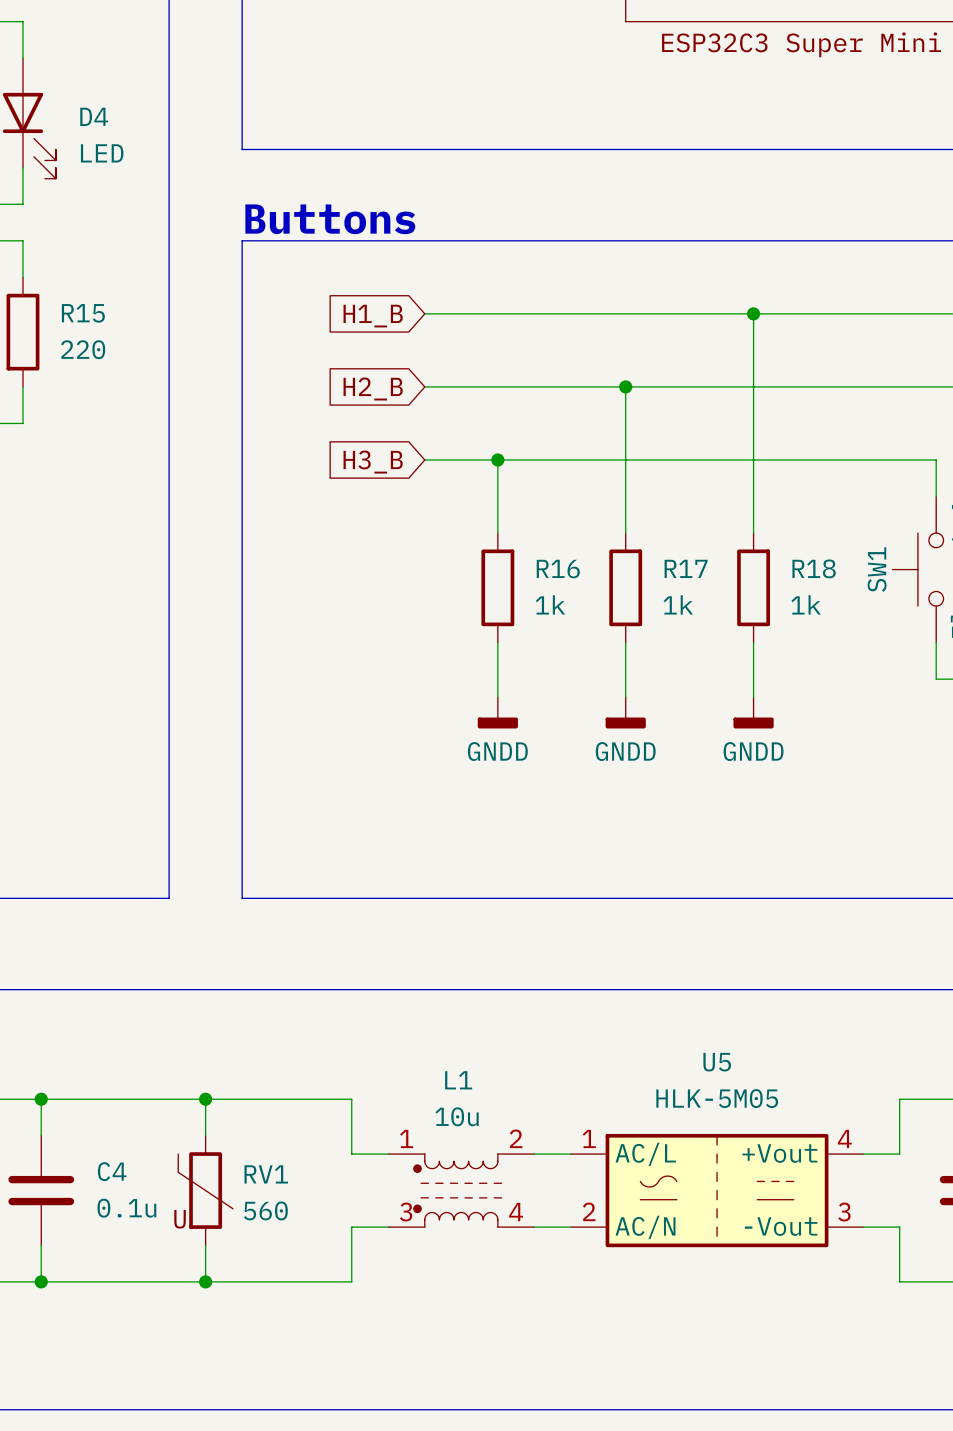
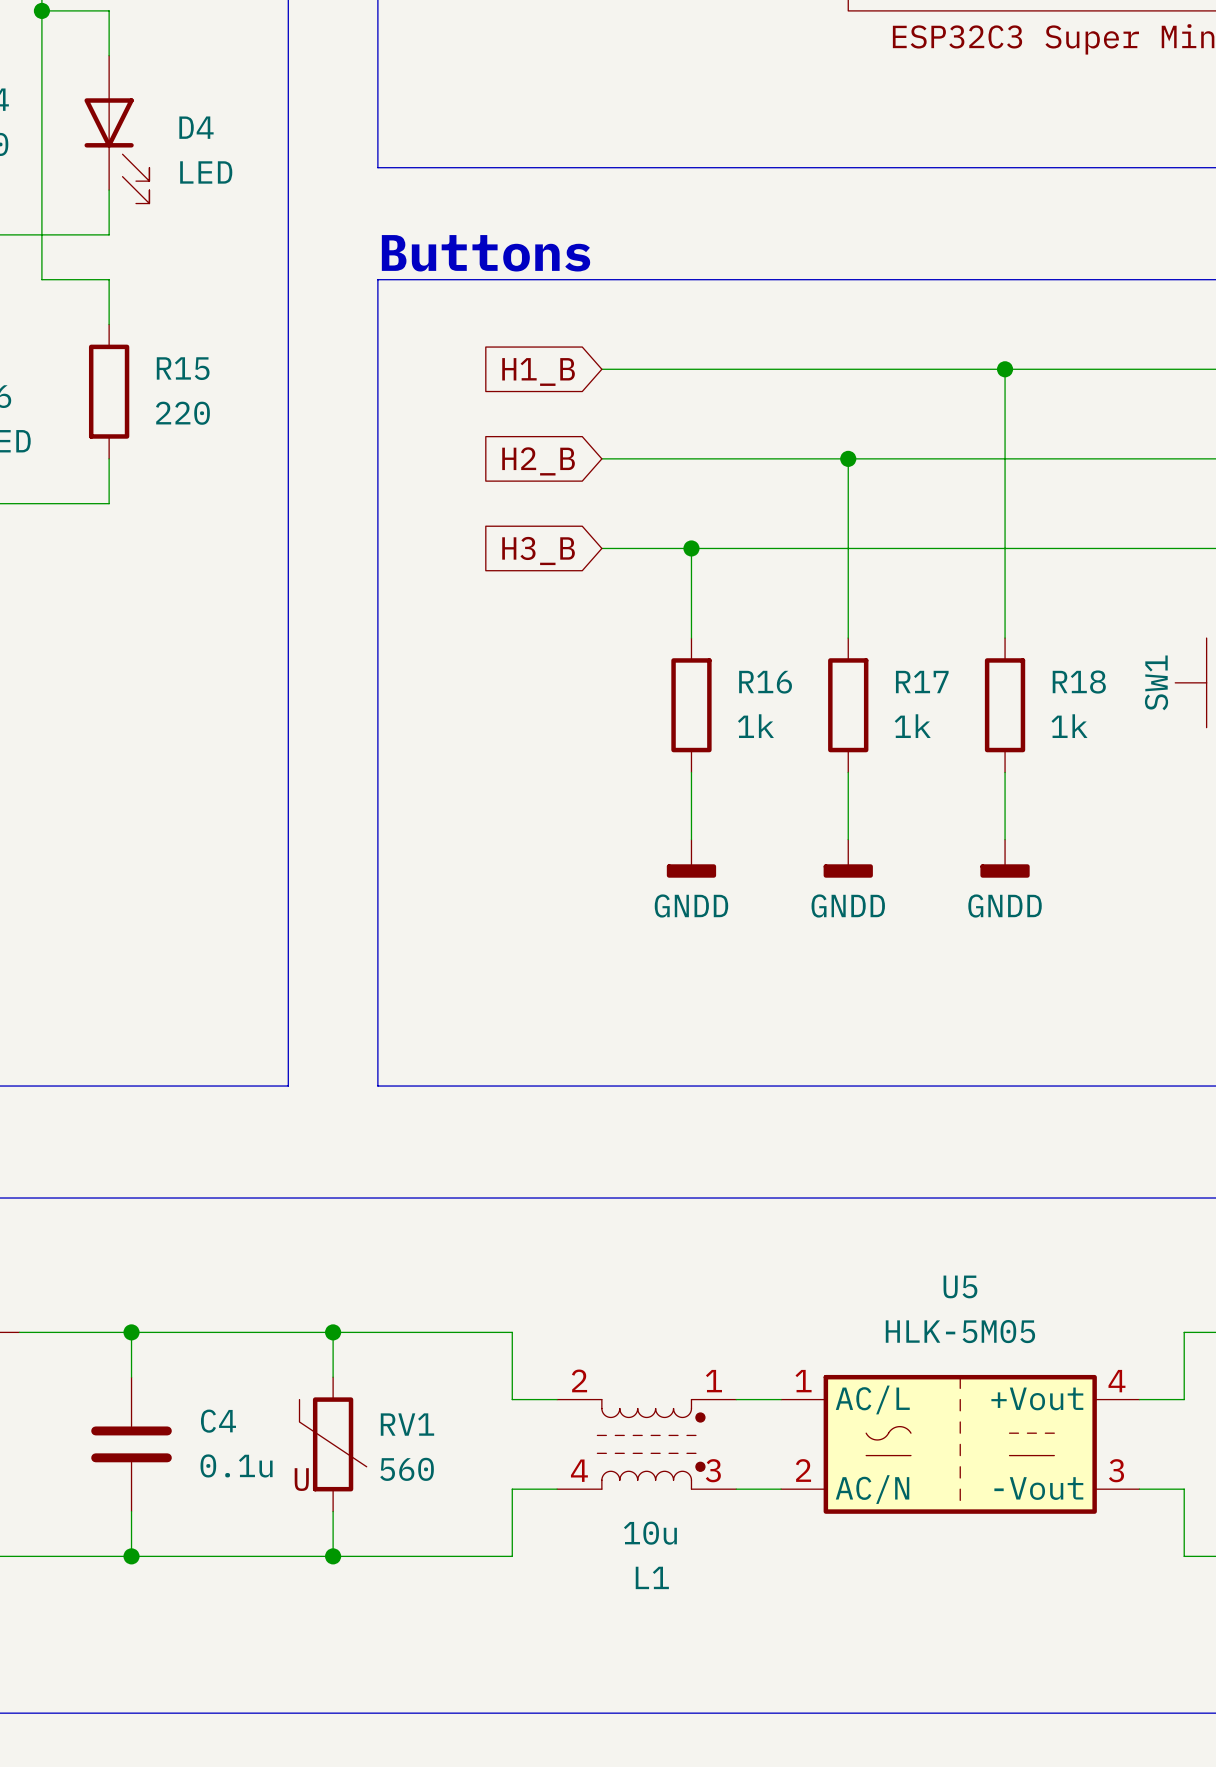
L1 name position: L1 (458, 1080) -> L1 (652, 1577)
L1 value position: 10u (457, 1116) -> 10u (650, 1533)
L1 flip: as is (457, 1190) -> left-right (651, 1444)

